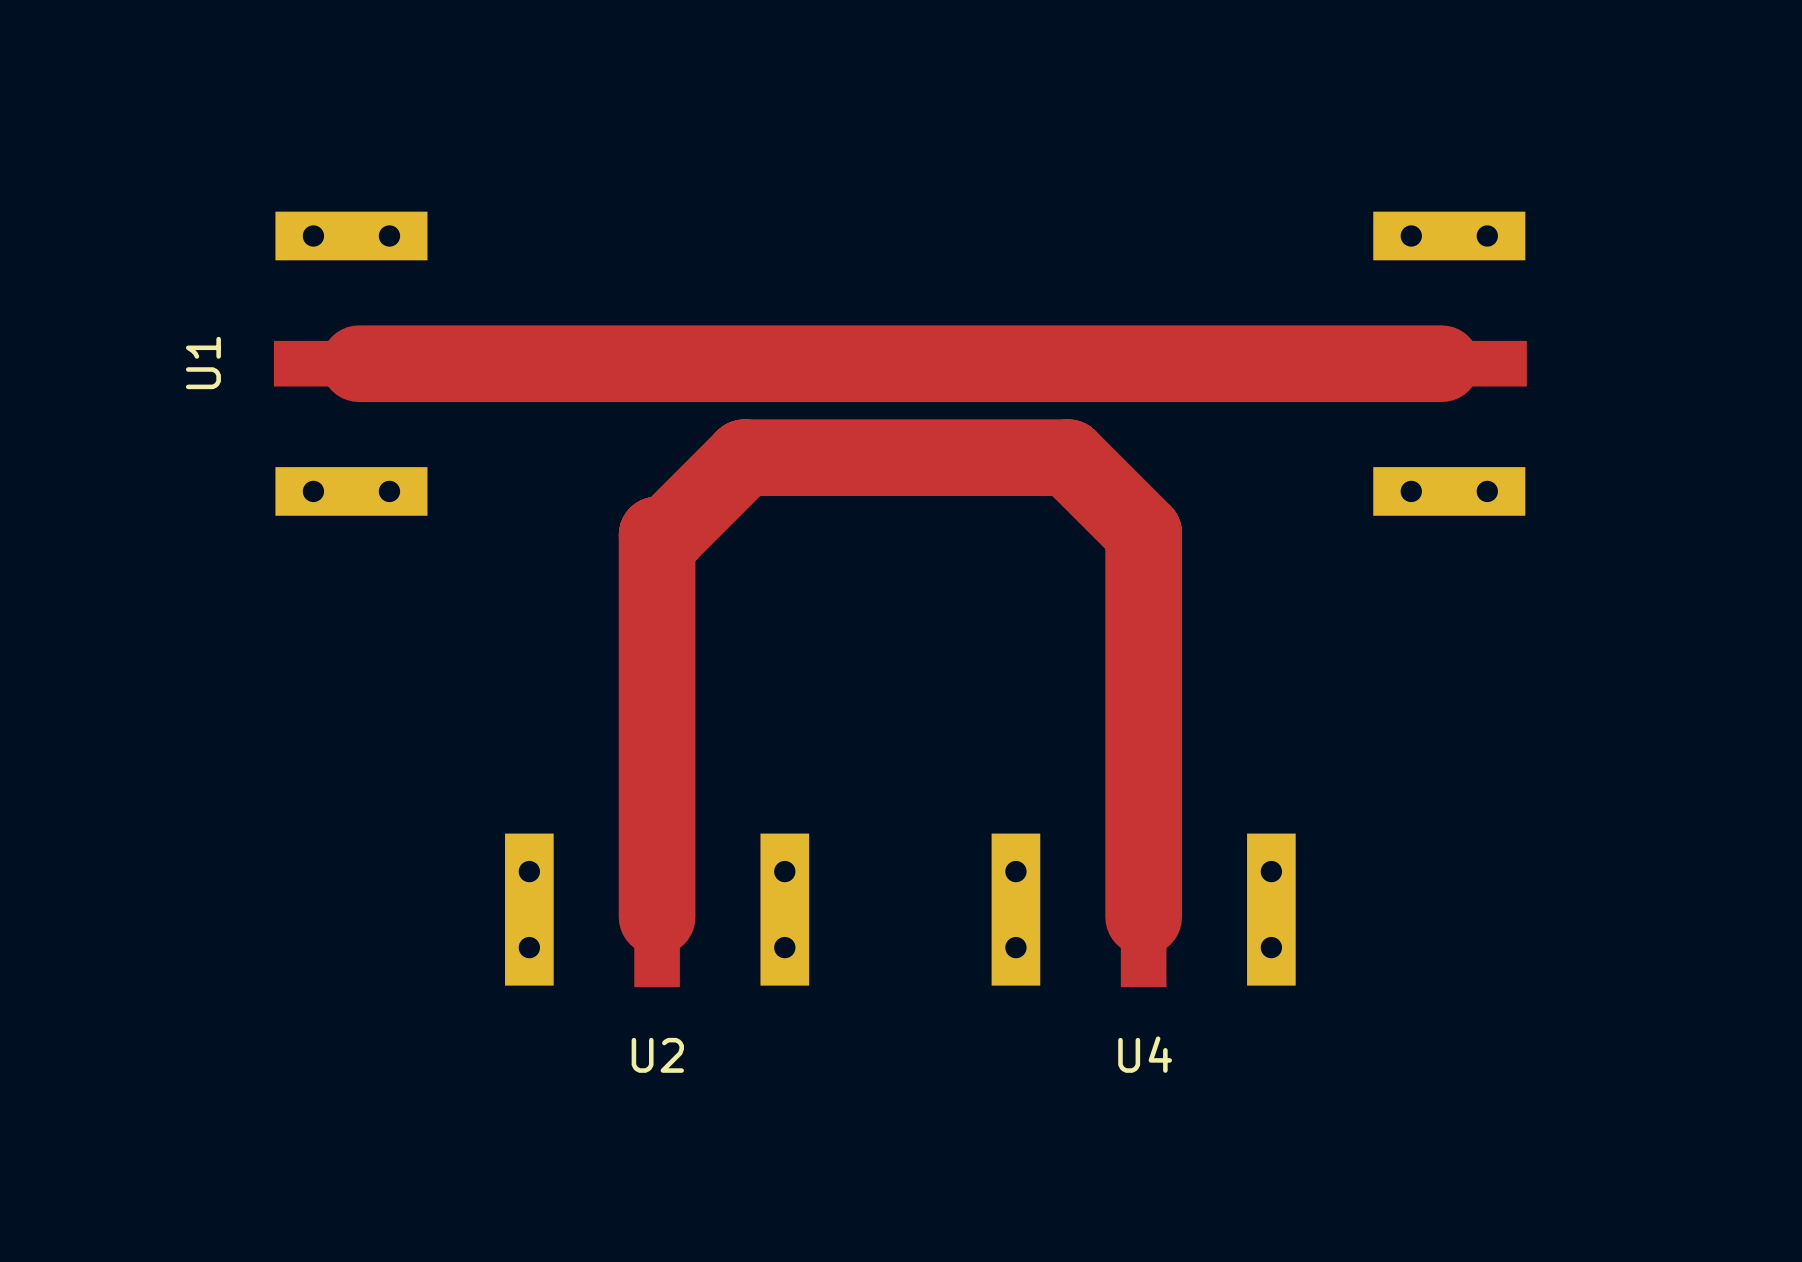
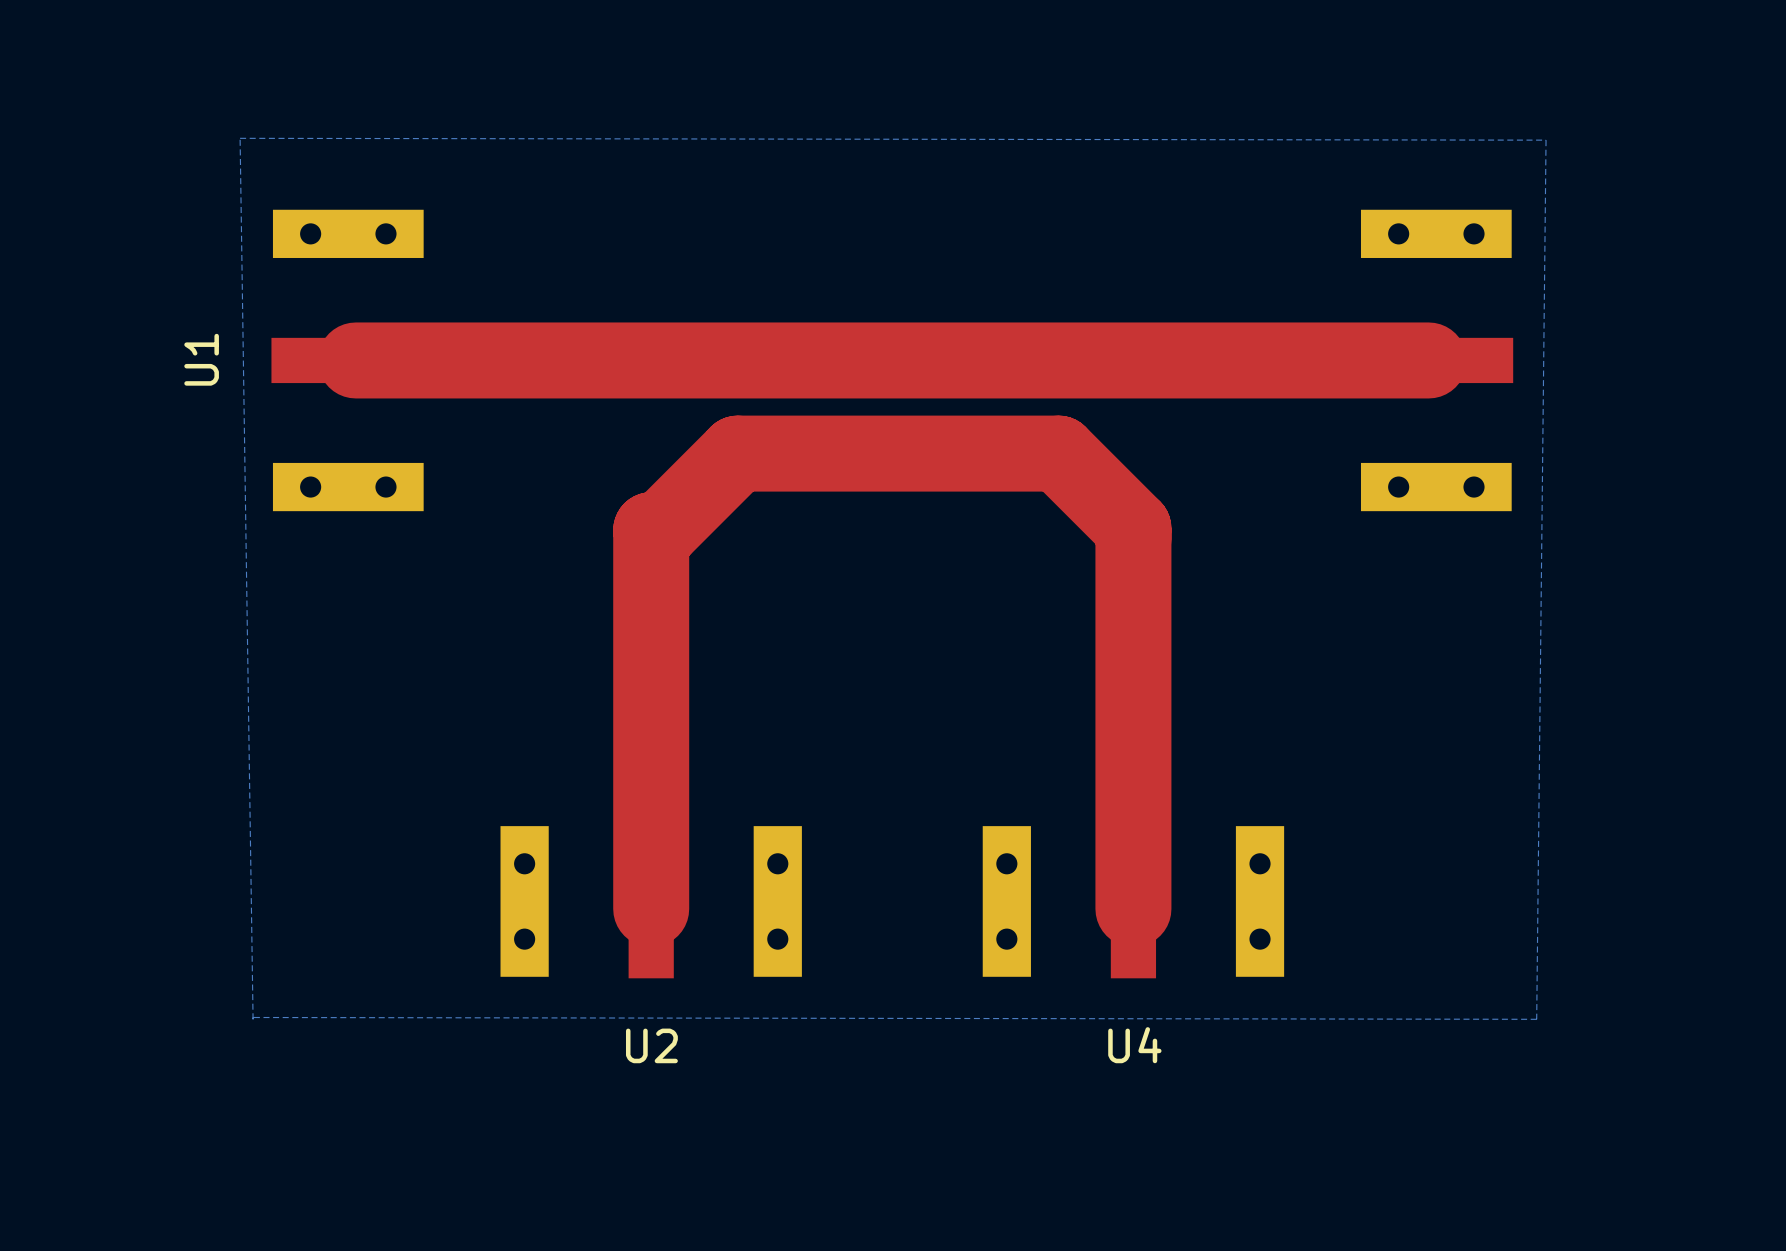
bottom zone outline: none -> (240, 138) (253, 1019) (253, 1017) (1536, 1019) (1546, 140) (240, 138)

